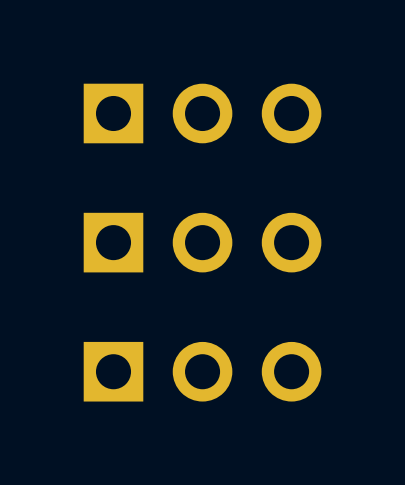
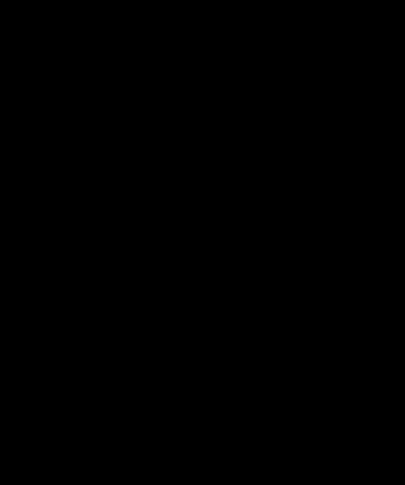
part: (202, 113) -> none
part: (202, 242) -> none
part: (202, 371) -> none

